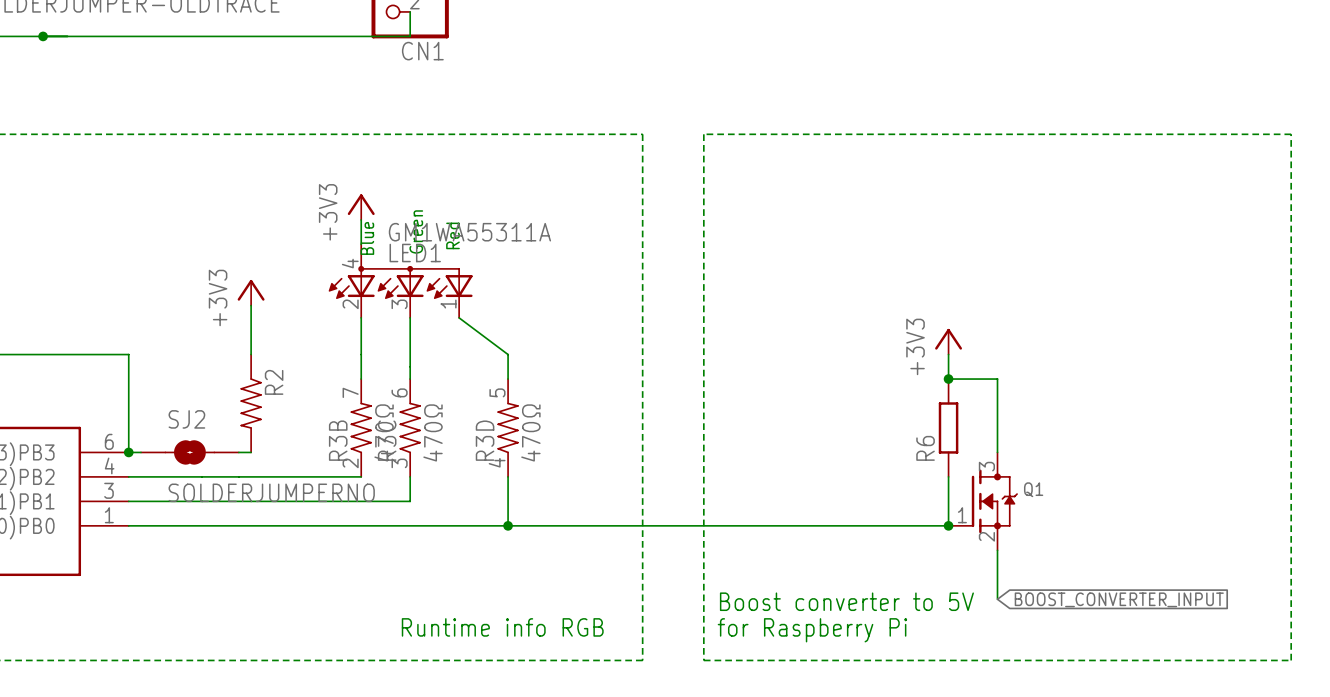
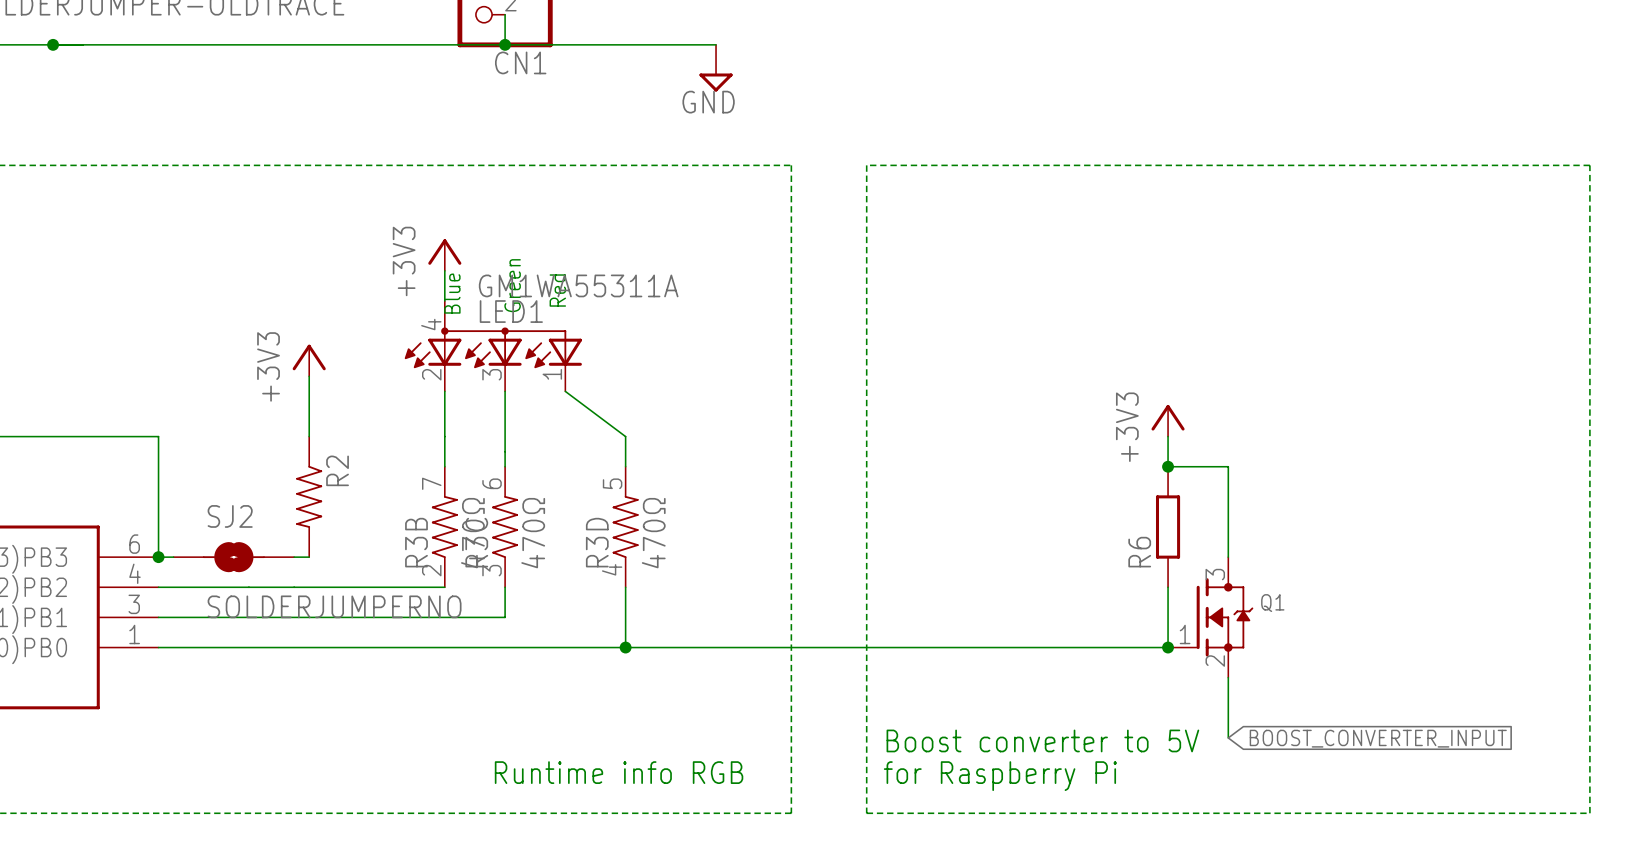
wire: none -> (505, 44) (716, 44)
junction: none -> (505, 44)
power symbol: none -> GND (716, 68)

